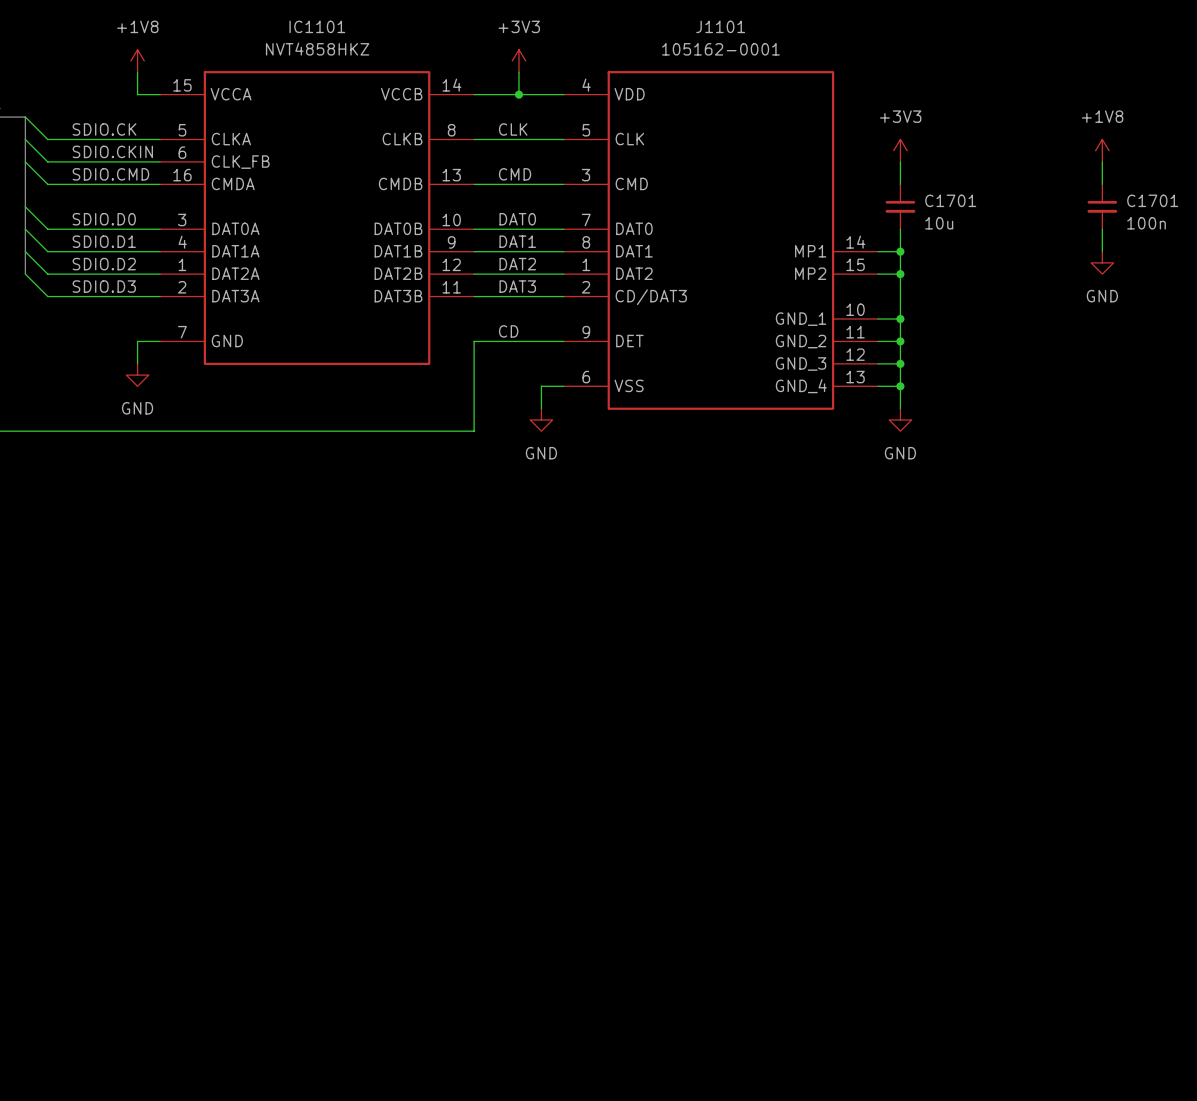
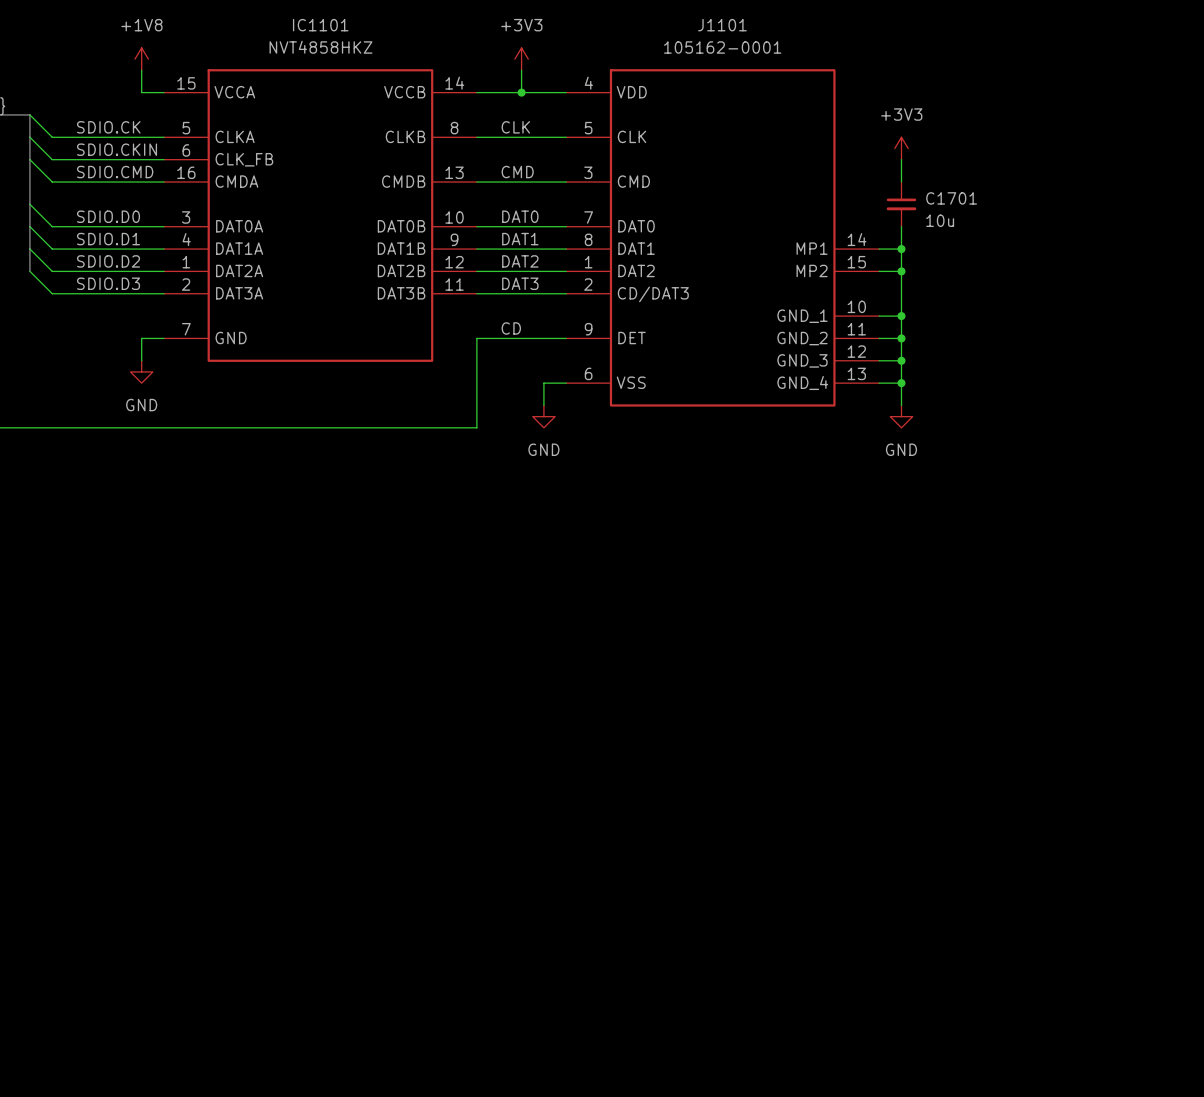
power symbol: +1V8 (1102, 150) -> none
wire: (1102, 161) (1102, 184) -> none
C1701: 100n (1102, 206) -> none
wire: (1102, 229) (1102, 251) -> none
power symbol: GND (1102, 262) -> none

